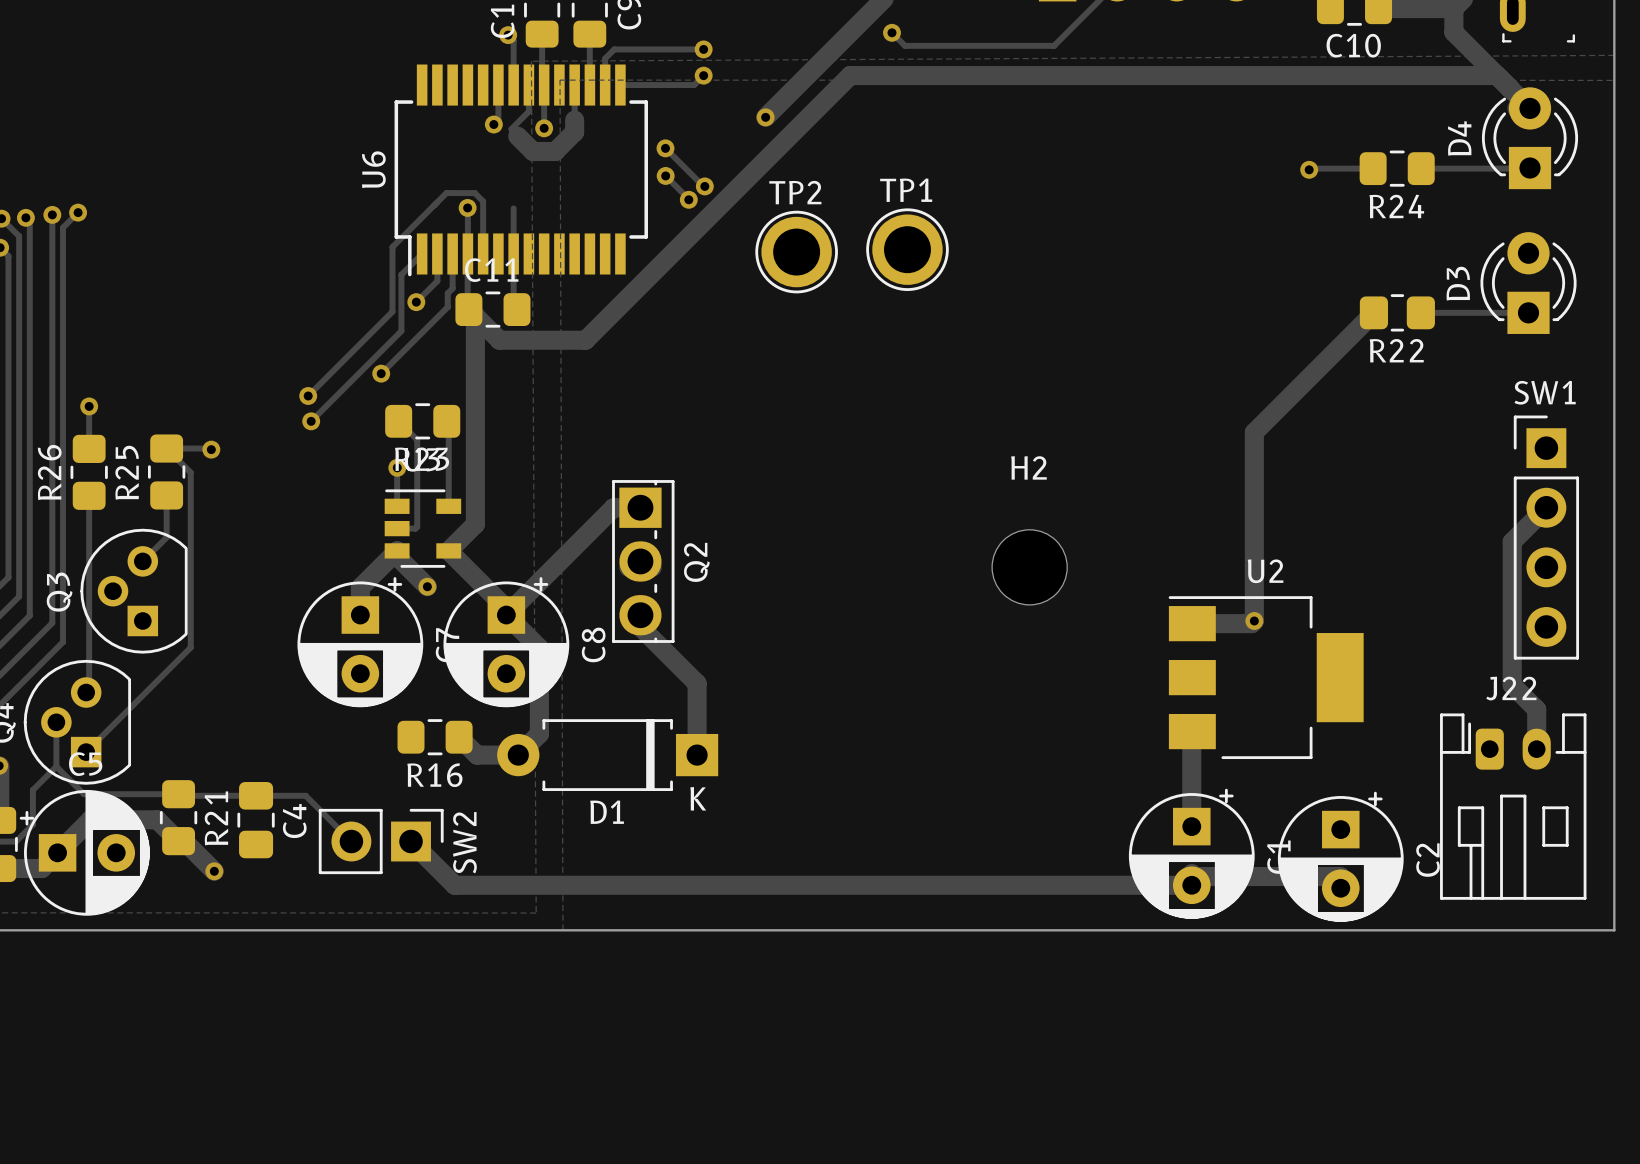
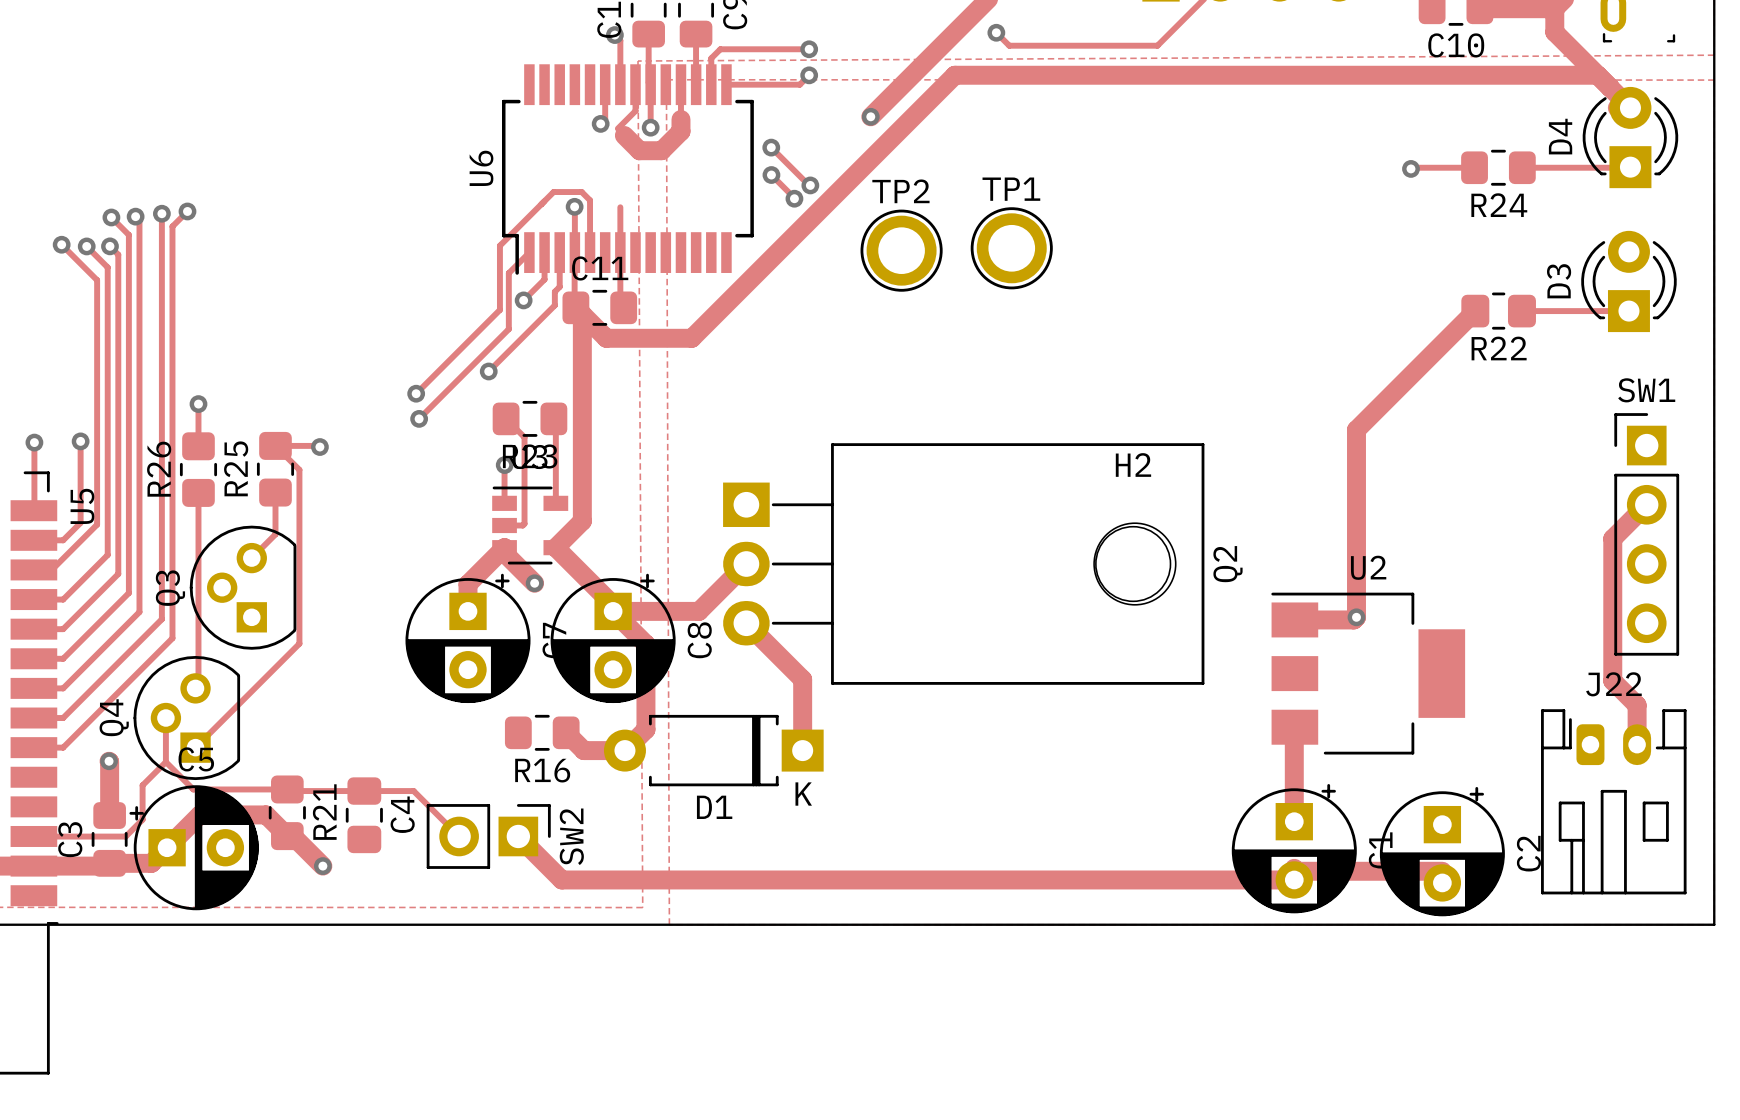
Q2 footprint: [612, 480, 675, 643] -> [723, 443, 1205, 685]
track: (640, 507) (613, 507) (506, 615) -> (746, 564) (699, 611) (613, 611)
Q2 name position: Q2 (696, 562) -> Q2 (1227, 564)

